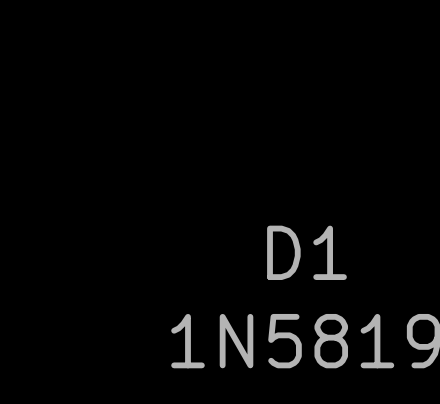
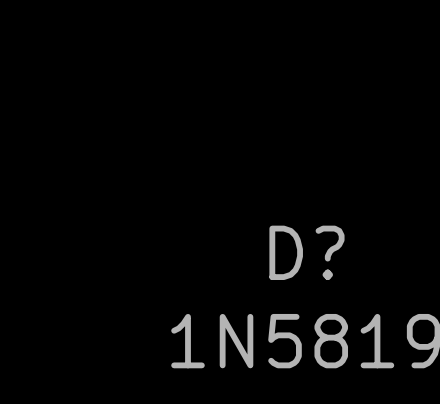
D1 name: D1 (306, 252) -> D? (306, 252)

